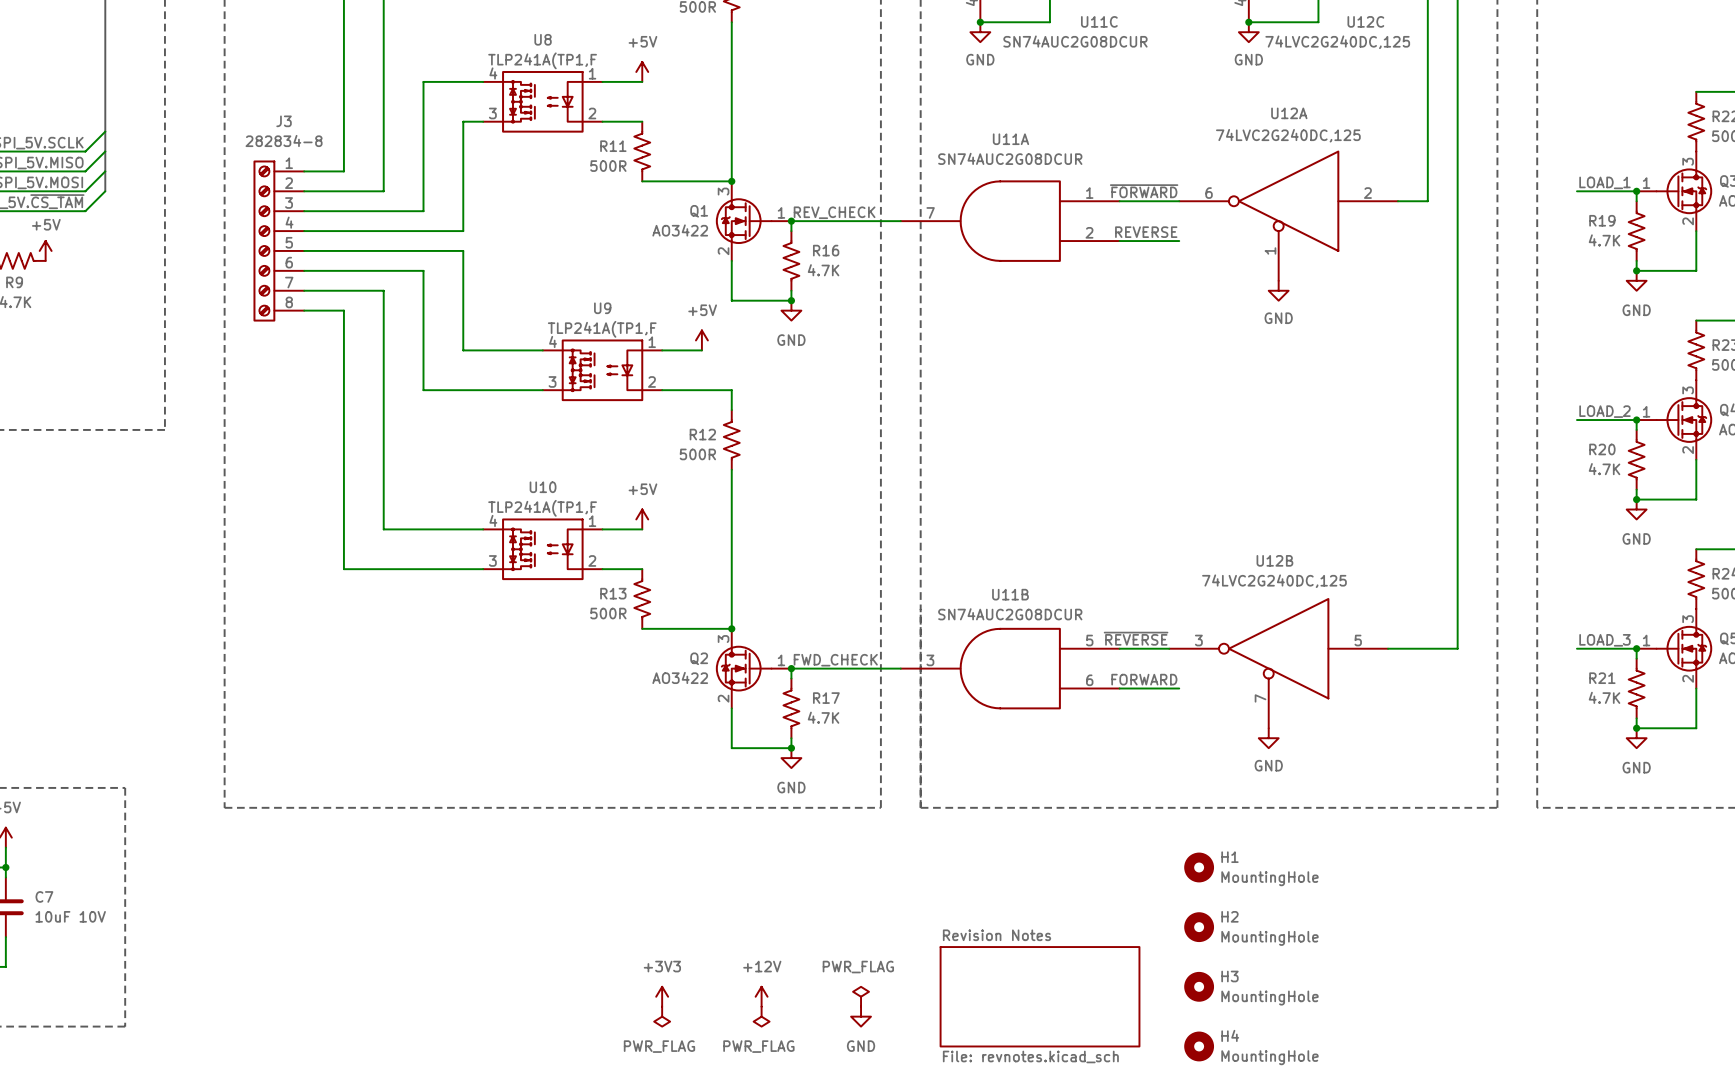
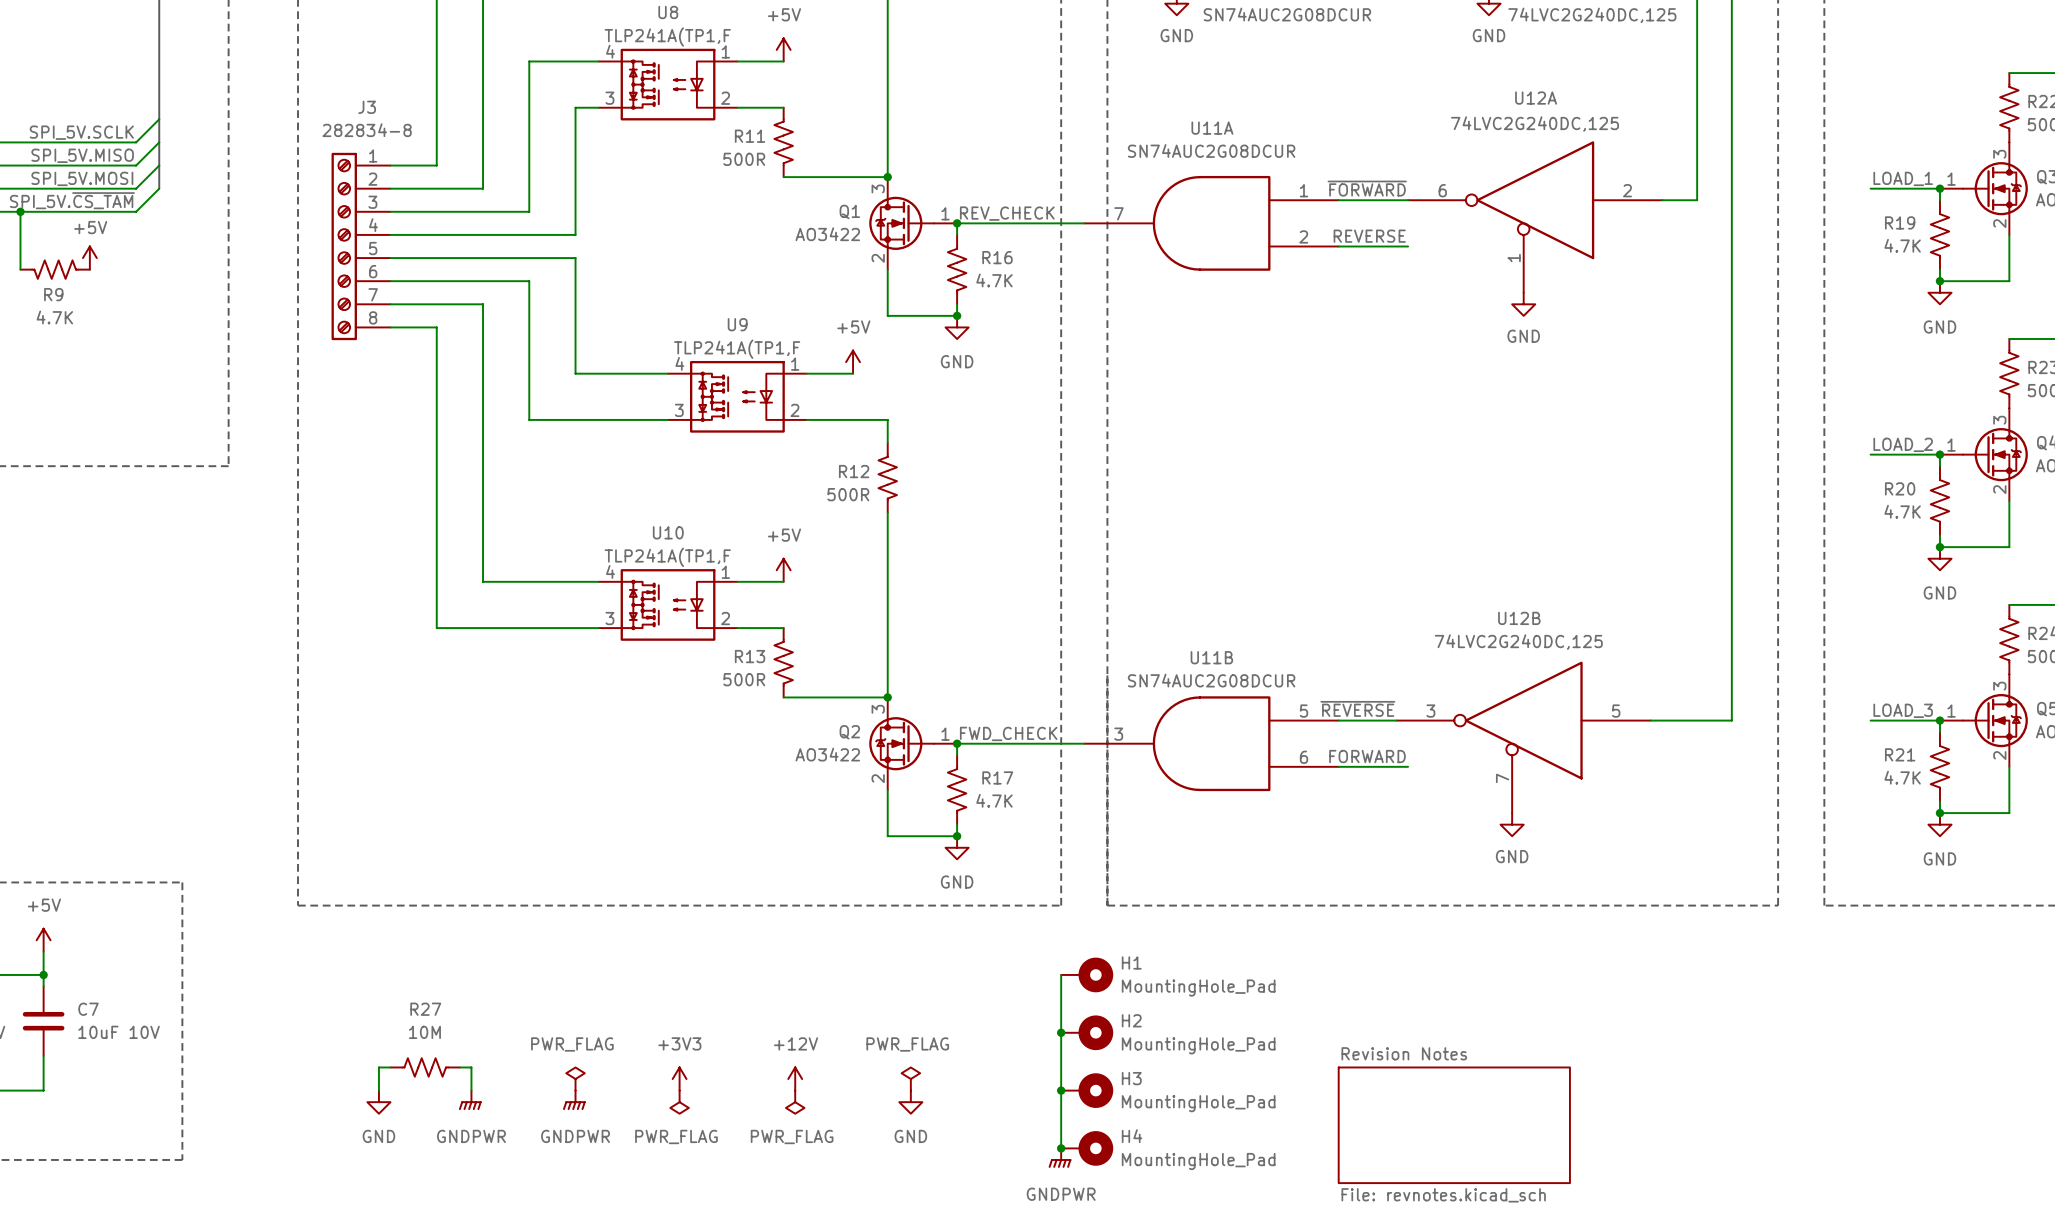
H1 symbol: [1184, 852, 1215, 883] -> [1061, 957, 1114, 993]
wire: none -> (1061, 974) (1061, 1148)
H1 value: MountingHole (1269, 878) -> MountingHole_Pad (1198, 988)
H2 symbol: [1184, 912, 1215, 943] -> [1061, 1015, 1114, 1051]
junction: none -> (1061, 1032)
H2 value: MountingHole (1269, 938) -> MountingHole_Pad (1198, 1045)
wire: none -> (390, 1067) (378, 1067) (378, 1090)
R27: none -> 10M (425, 1067)
wire: none -> (459, 1067) (471, 1067) (471, 1090)
power symbol: none -> PWR_FLAG (575, 1079)
power symbol: none -> PWR_FLAG (910, 1079)
junction: none -> (1061, 1090)
H3 symbol: [1184, 971, 1215, 1002] -> [1061, 1073, 1114, 1108]
power symbol: none -> GNDPWR (470, 1100)
power symbol: none -> GNDPWR (574, 1100)
power symbol: none -> GND (378, 1102)
power symbol: none -> PWR_FLAG (679, 1102)
power symbol position: +3V3 (662, 996) -> +3V3 (679, 1079)
power symbol position: +12V (761, 996) -> +12V (795, 1079)
power symbol: PWR_FLAG (861, 996) -> none
sheet Revision Notes position: (1040, 996) -> (1454, 1125)
H3 value: MountingHole (1269, 998) -> MountingHole_Pad (1198, 1103)
power symbol position: PWR_FLAG (662, 1016) -> PWR_FLAG (795, 1102)
power symbol: PWR_FLAG (761, 1016) -> none
power symbol position: GND (861, 1016) -> GND (910, 1102)
junction: none -> (1061, 1148)
power symbol: none -> GNDPWR (1060, 1158)
H4 symbol: [1184, 1031, 1215, 1062] -> [1061, 1131, 1114, 1166]
H4 value: MountingHole (1269, 1057) -> MountingHole_Pad (1198, 1161)

